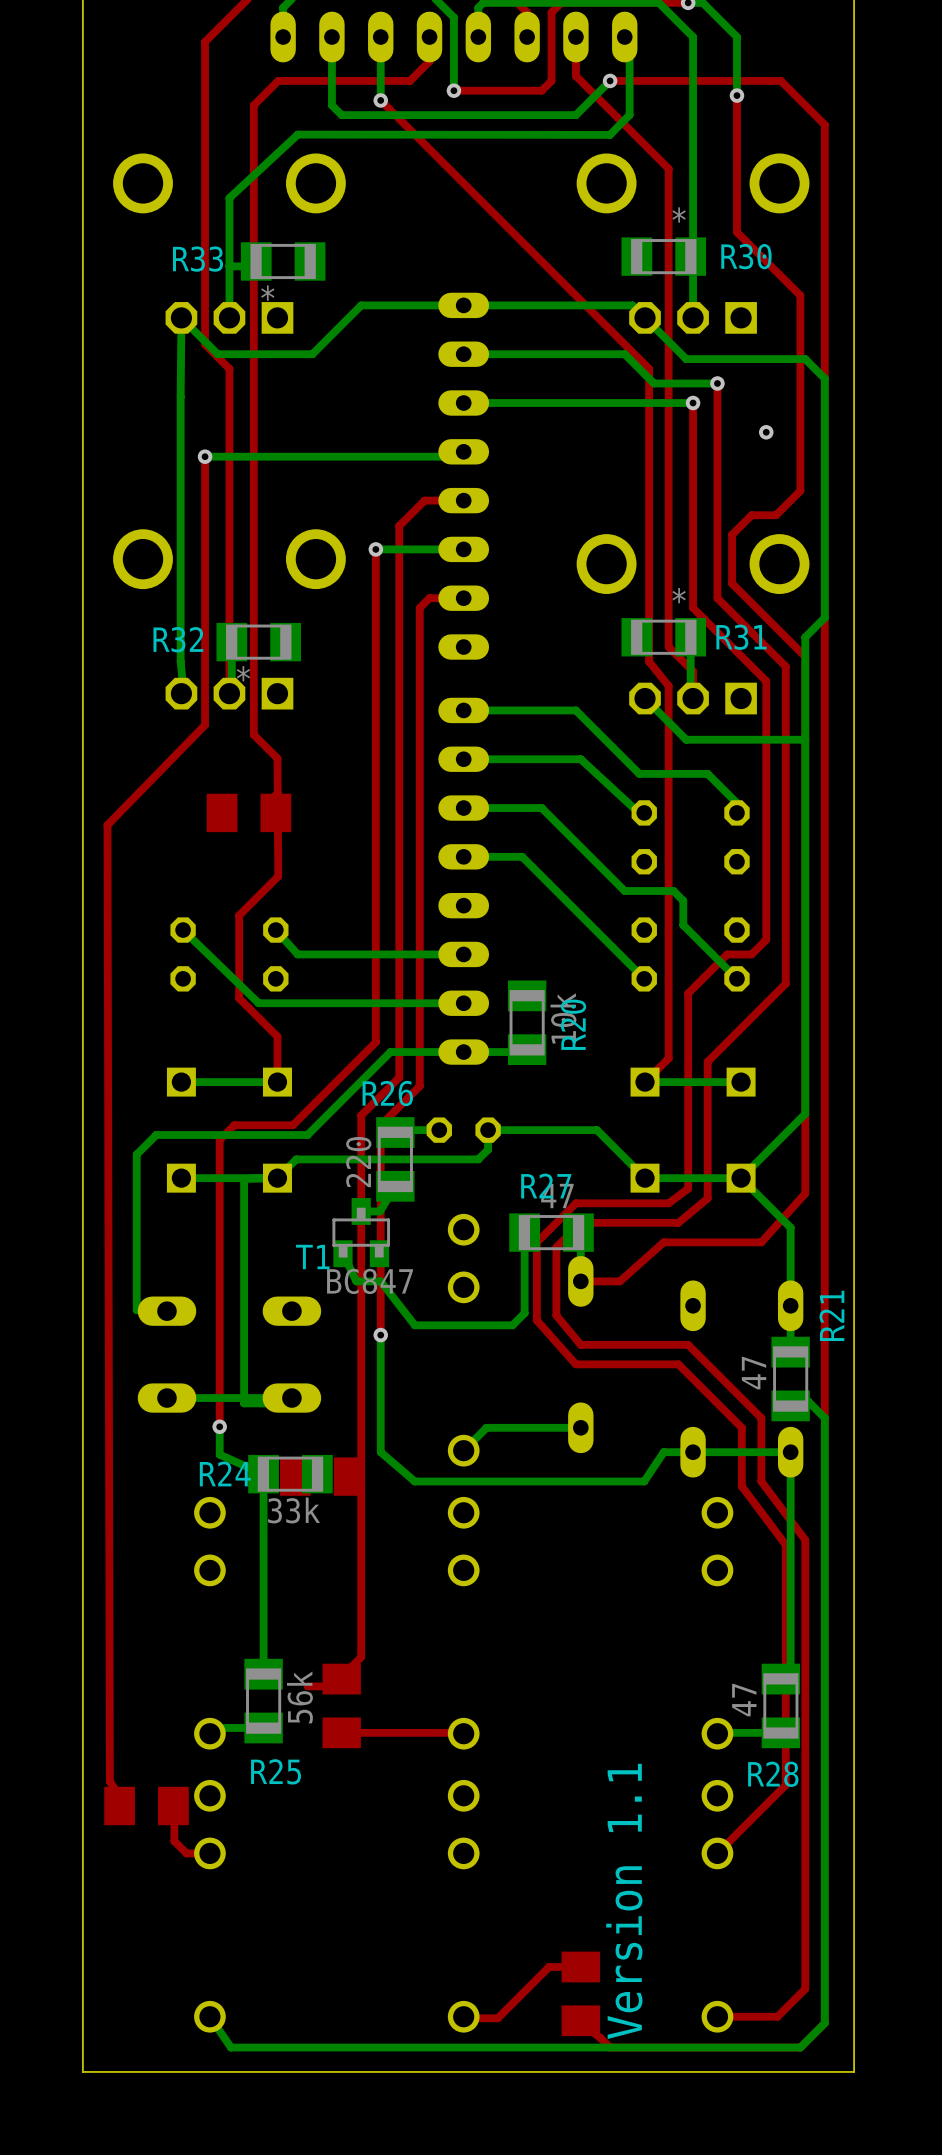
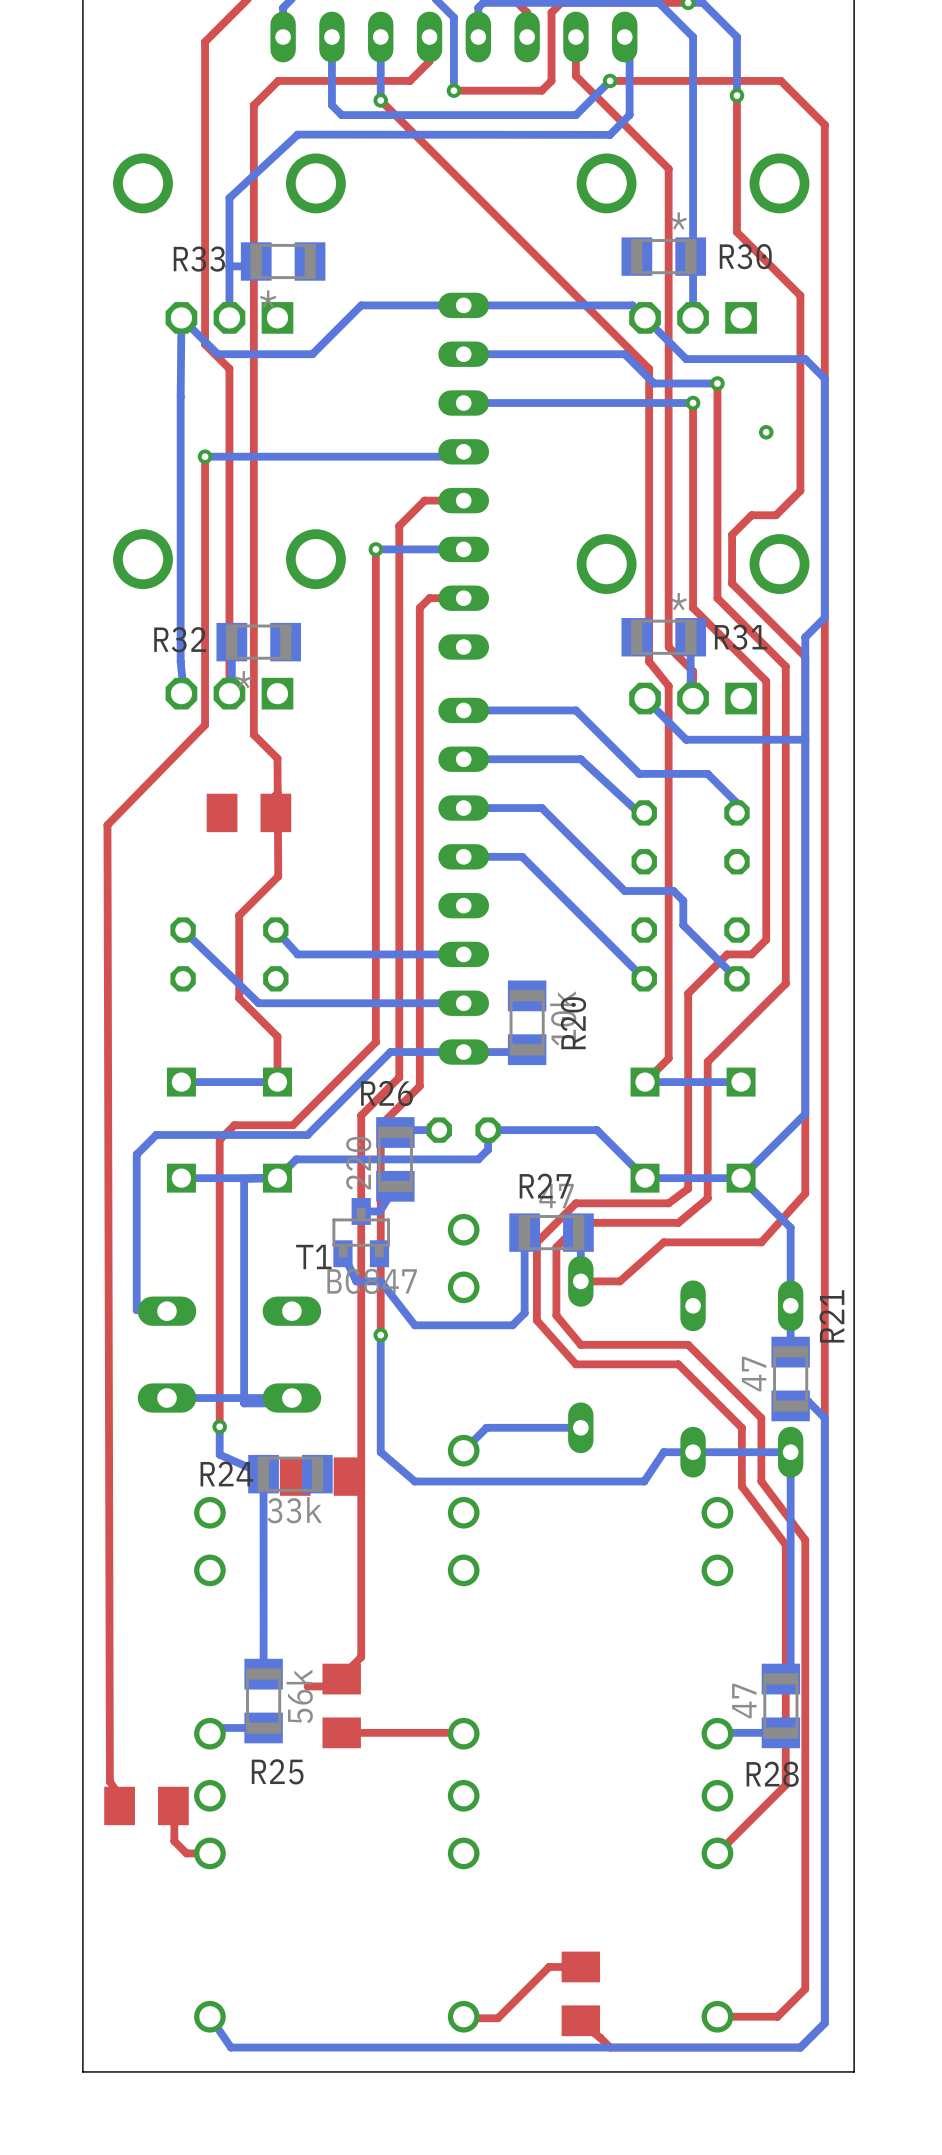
text: Version 1.1 (624, 1901) -> none

